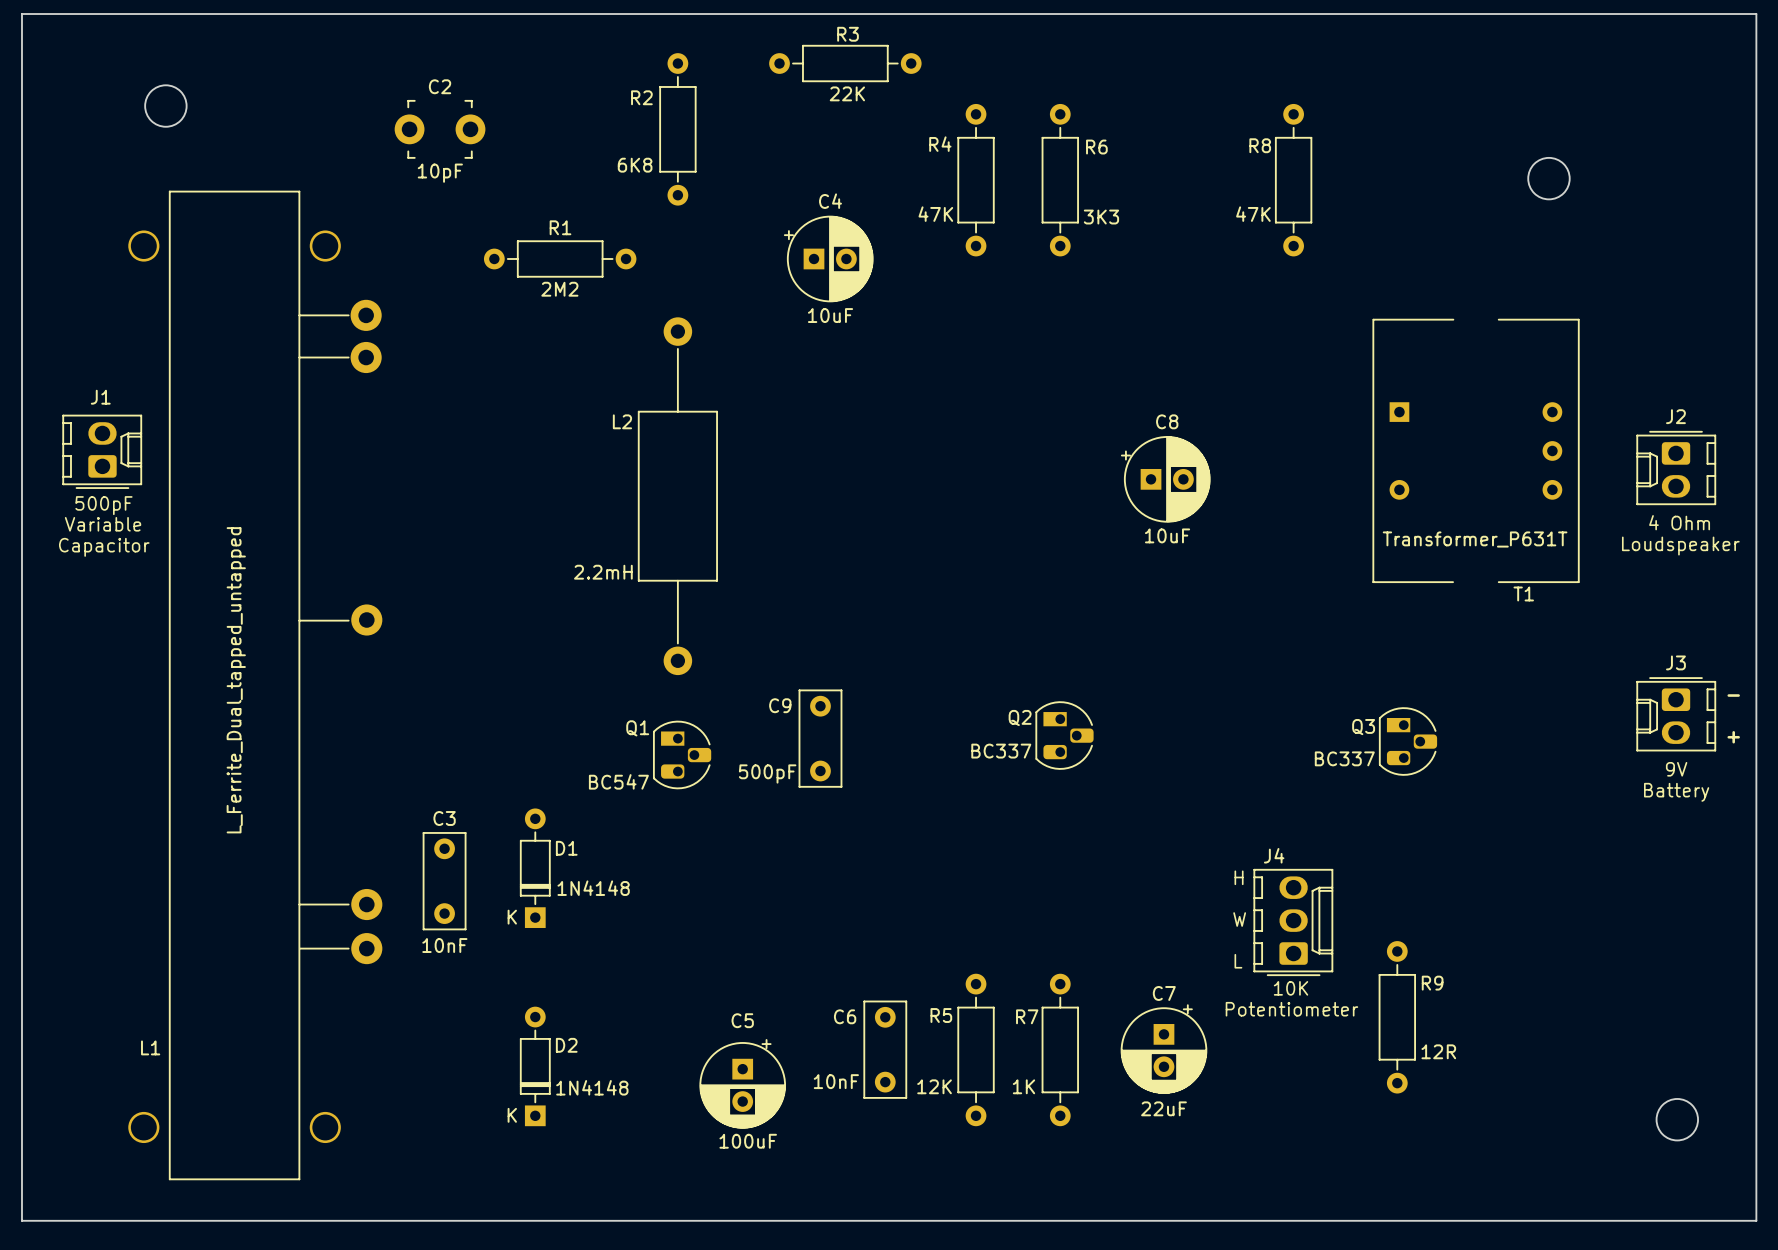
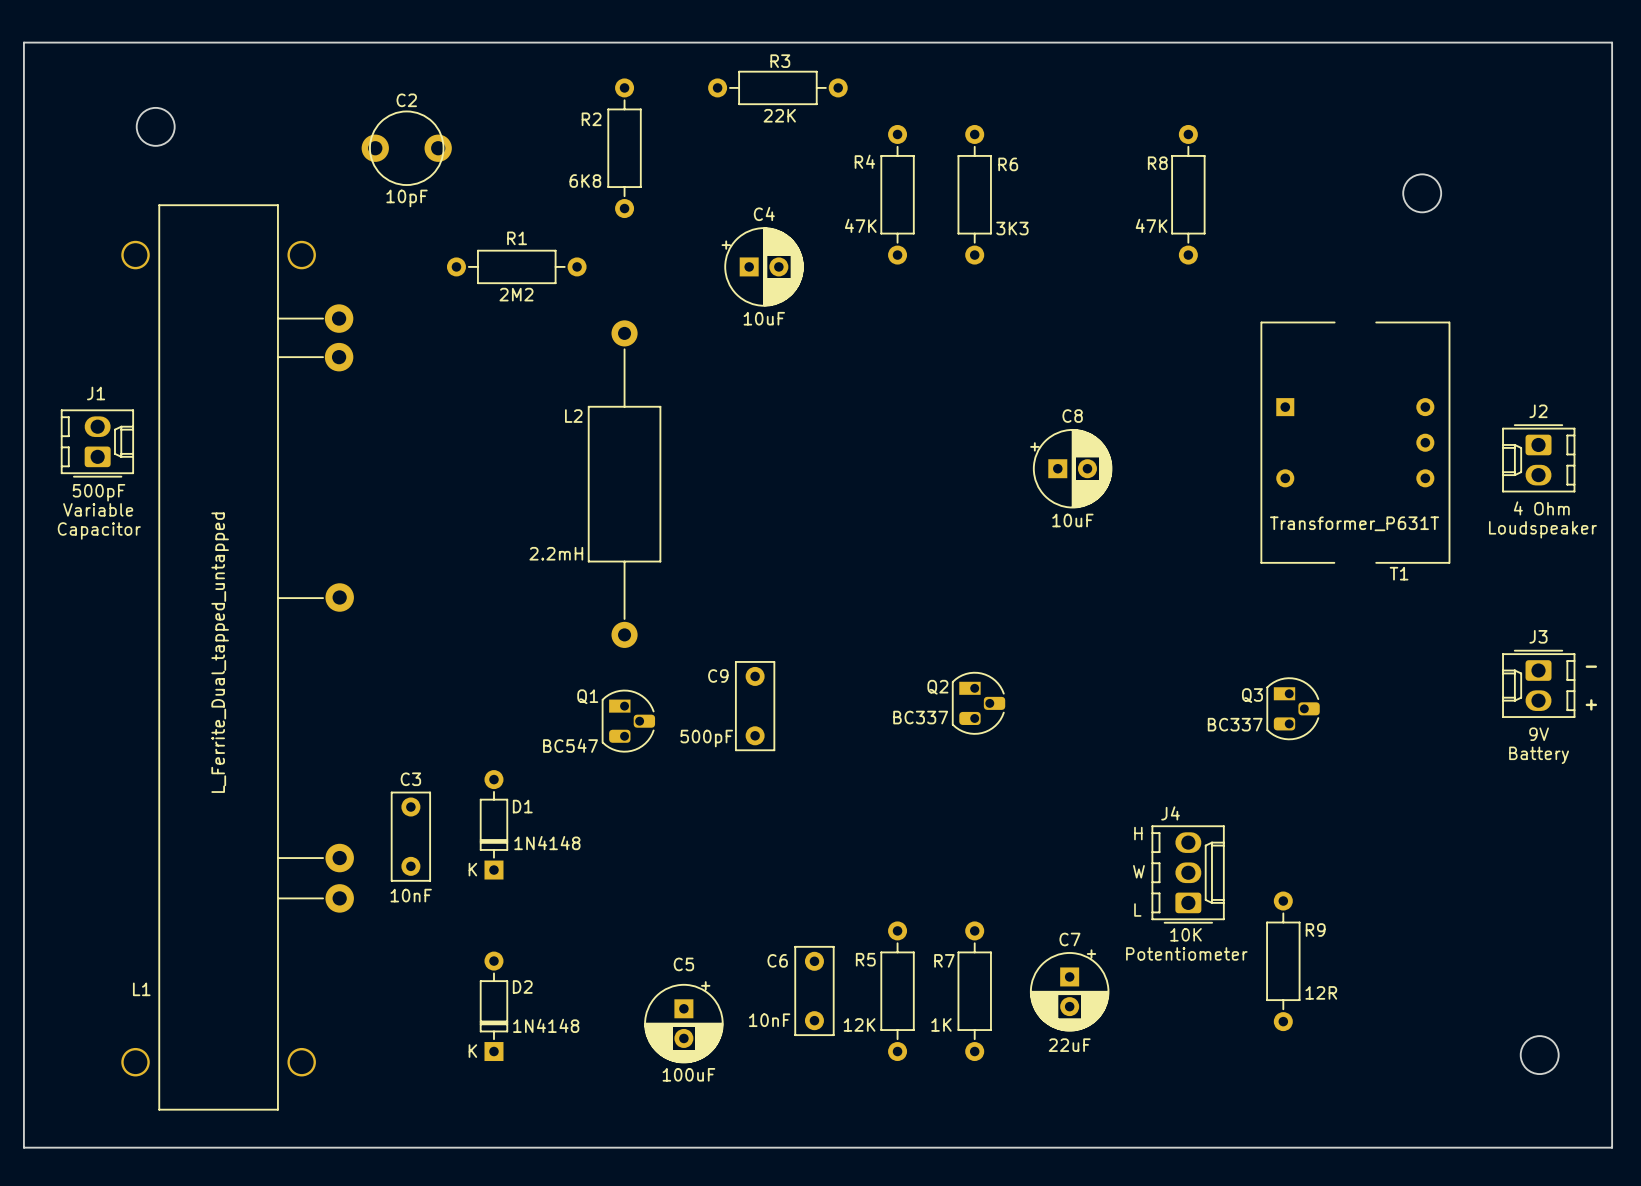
C2 footprint: [394, 100, 486, 159] -> [361, 110, 452, 186]

